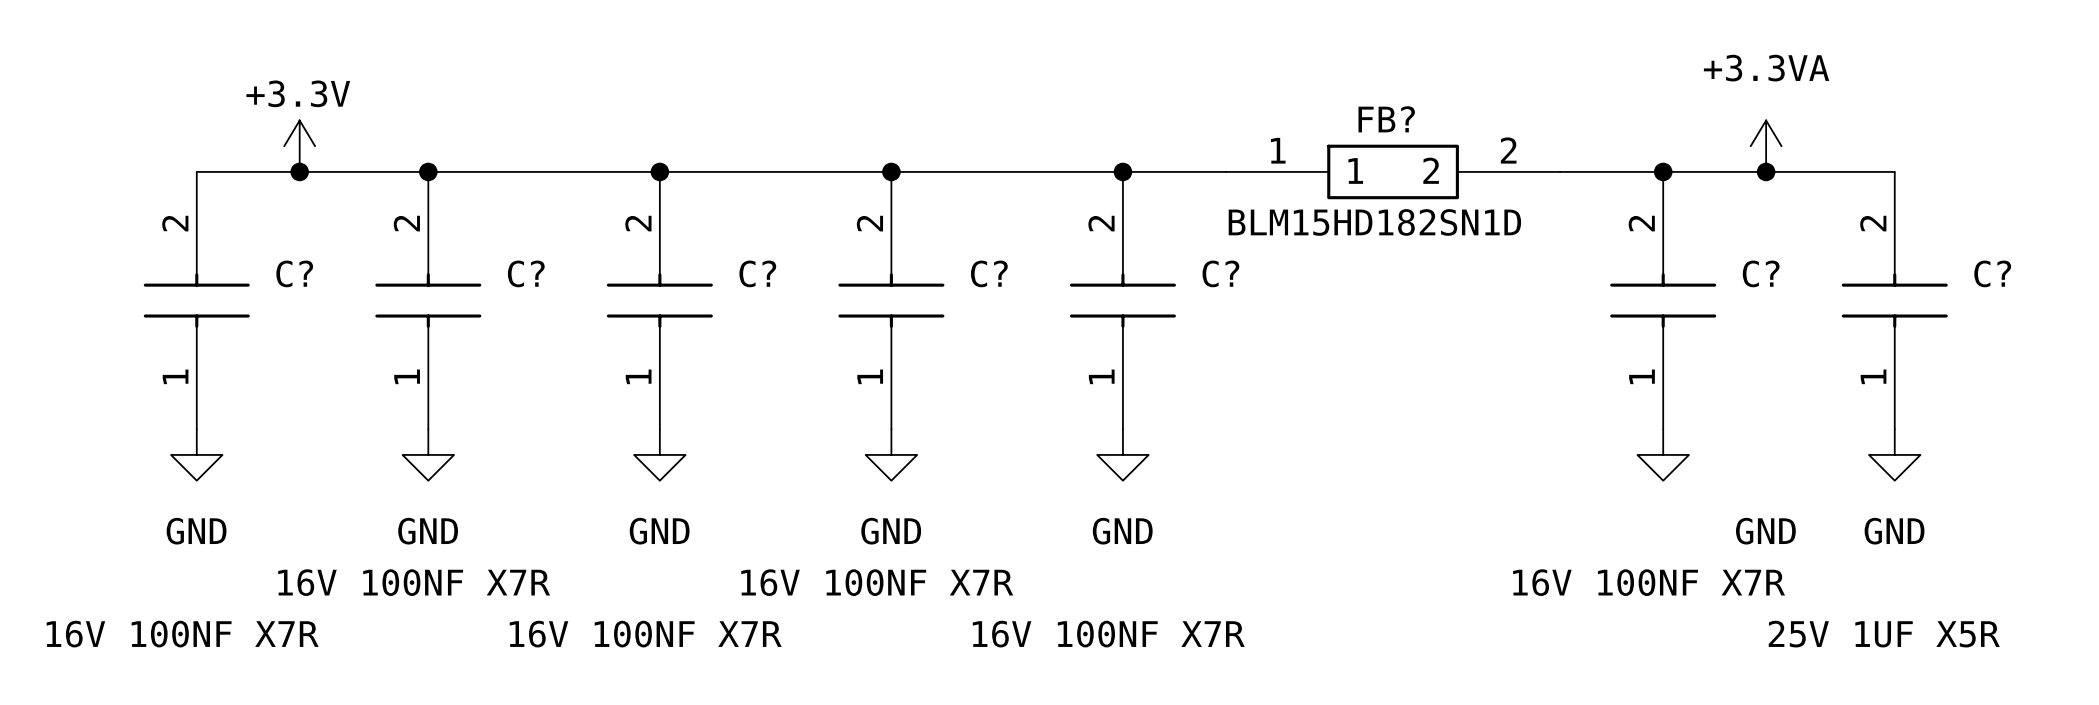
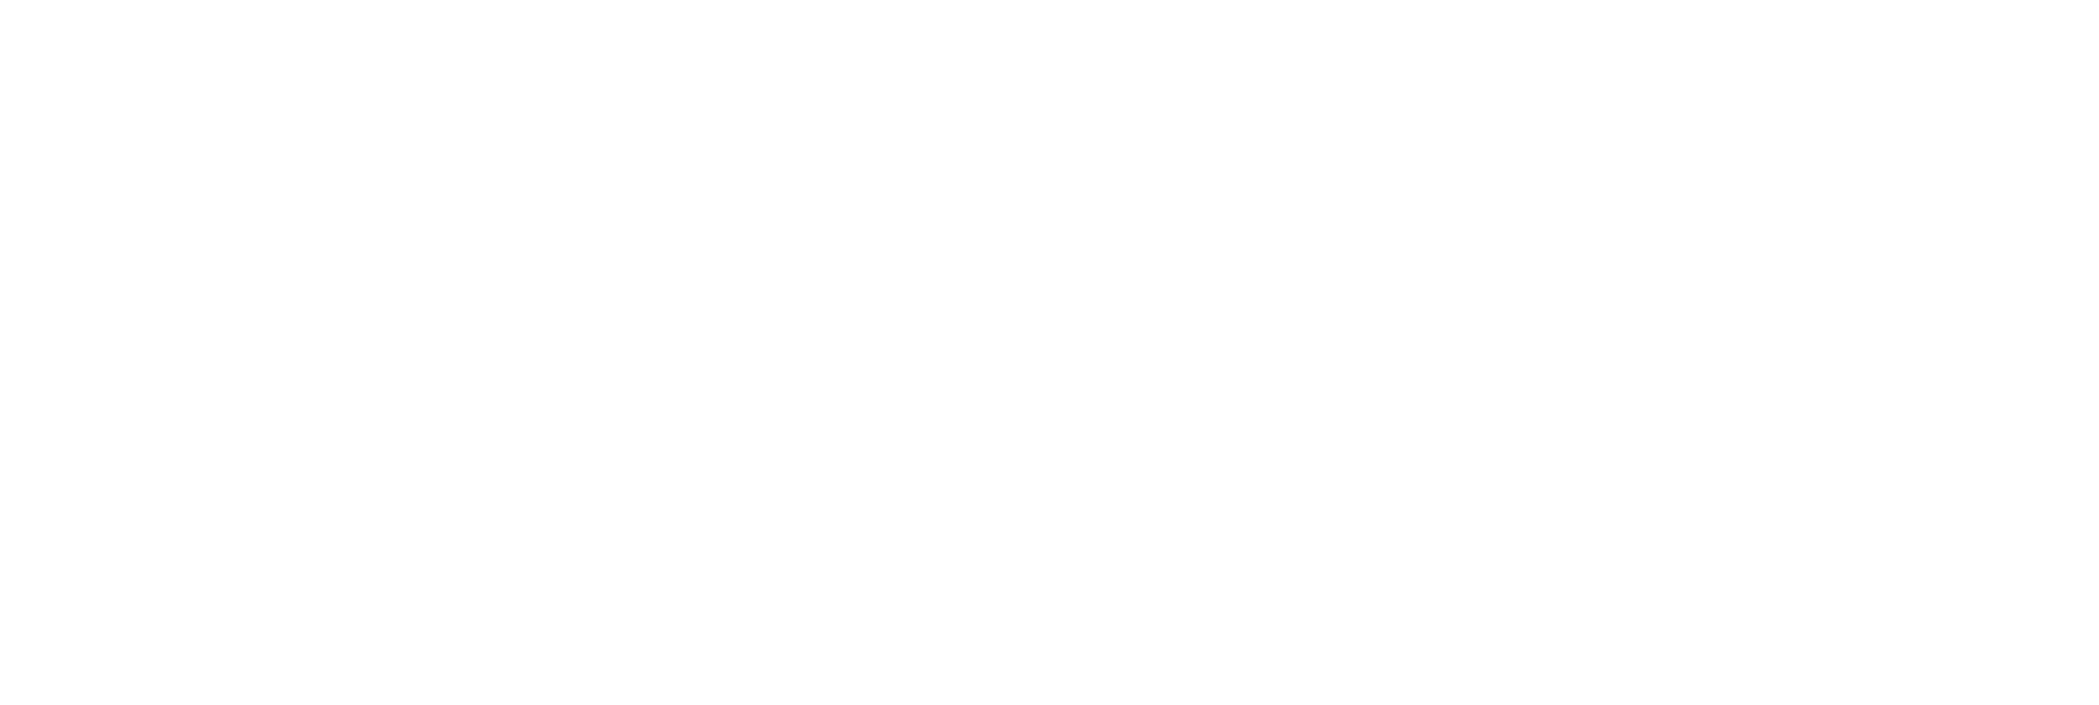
power symbol: +3.3V (299, 146) -> none
power symbol: +3.3VA (1766, 146) -> none
wire: (196, 171) (1225, 171) -> none
junction: (299, 171) -> none
junction: (428, 171) -> none
junction: (659, 171) -> none
junction: (891, 171) -> none
junction: (1122, 171) -> none
FB?: BLM15HD182SN1D (1393, 171) -> none
wire: (1560, 171) (1894, 171) -> none
junction: (1663, 171) -> none
junction: (1766, 171) -> none
C?: 16V 100NF X7R (196, 300) -> none
C?: 16V 100NF X7R (428, 300) -> none
C?: 16V 100NF X7R (659, 300) -> none
C?: 16V 100NF X7R (891, 300) -> none
C?: 16V 100NF X7R (1122, 300) -> none
C?: 16V 100NF X7R (1663, 300) -> none
C?: 25V 1UF X5R (1894, 300) -> none
power symbol: GND (196, 454) -> none
power symbol: GND (428, 454) -> none
power symbol: GND (659, 454) -> none
power symbol: GND (891, 454) -> none
power symbol: GND (1122, 454) -> none
power symbol: GND (1663, 454) -> none
power symbol: GND (1894, 454) -> none

